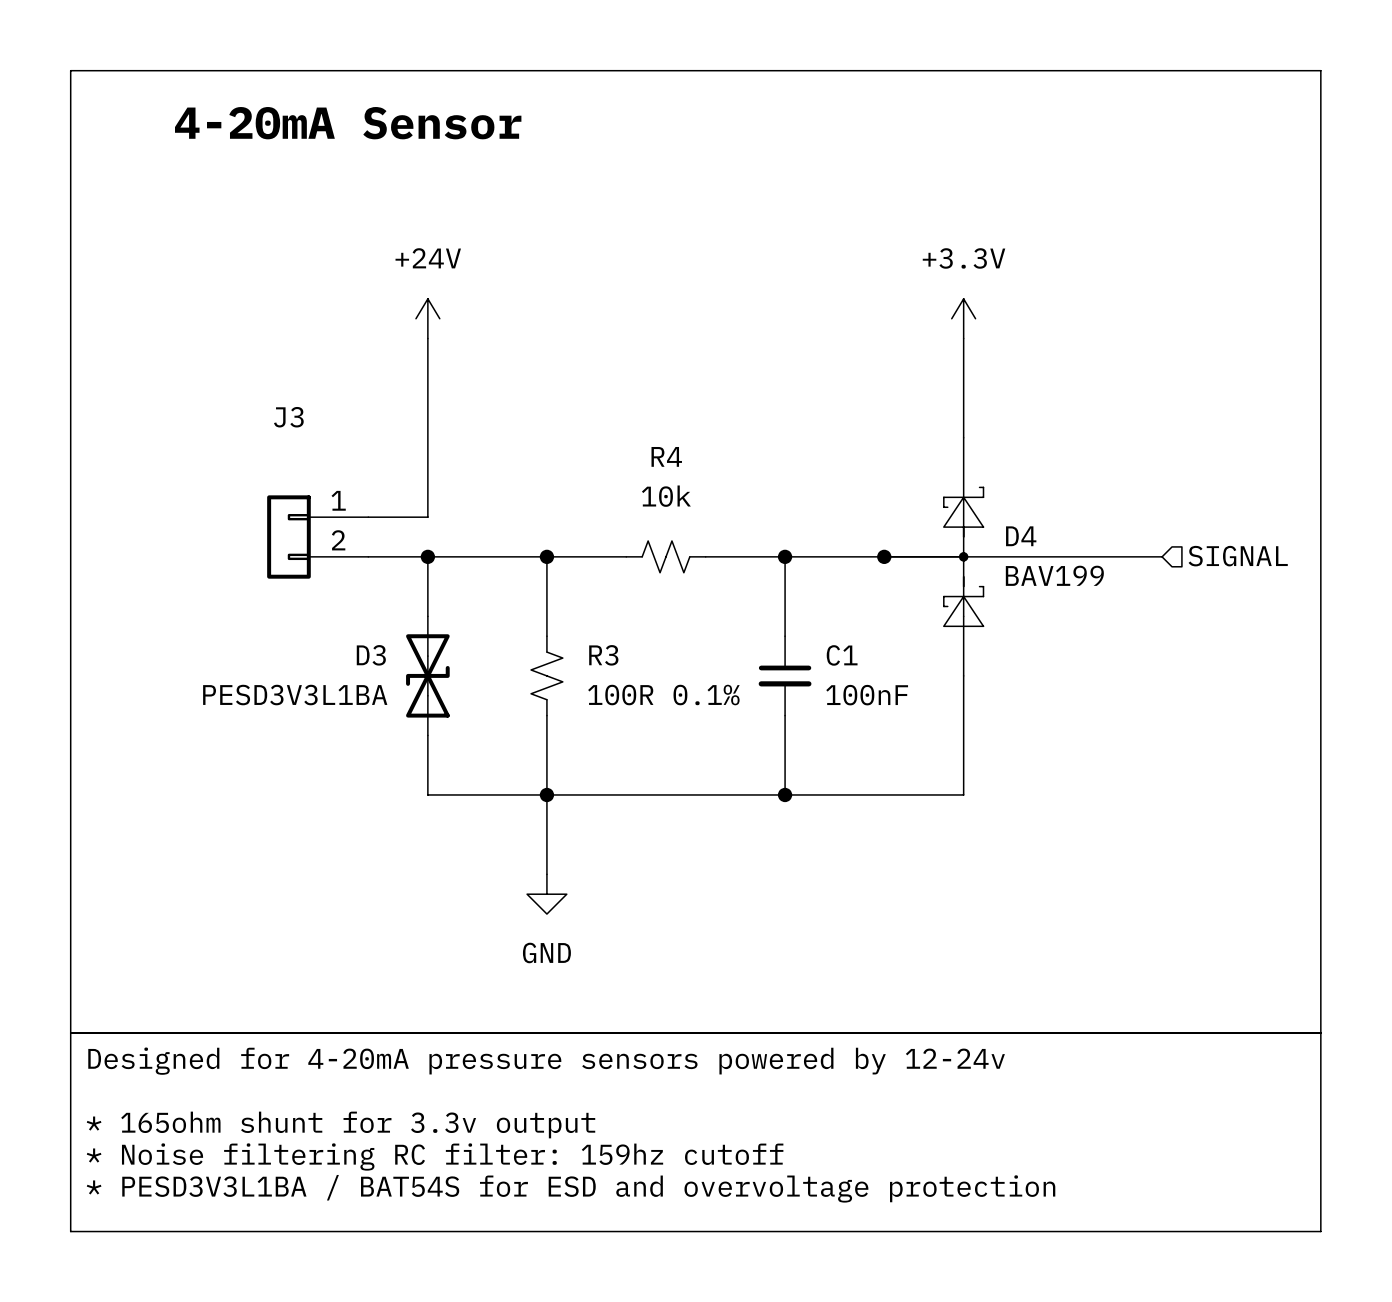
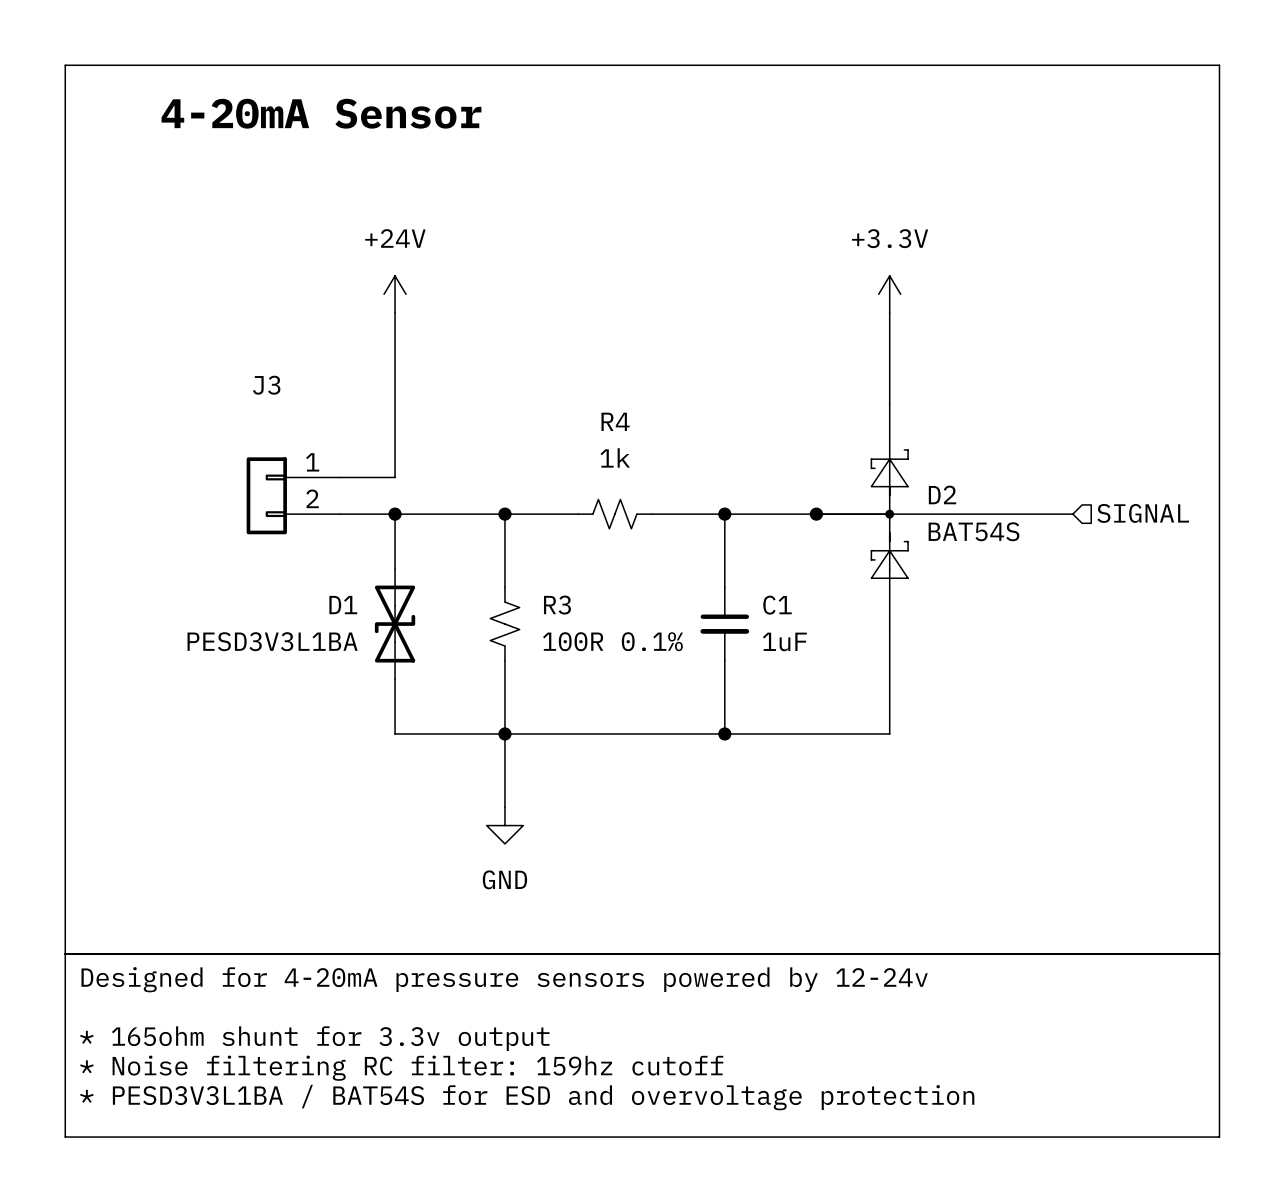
R4 value: 10k (666, 496) -> 1k (615, 457)
D4 name: D4 (1021, 536) -> D2 (942, 494)
D4 value: BAV199 (1054, 575) -> BAT54S (973, 531)
D3 name: D3 (371, 655) -> D1 (343, 605)
C1 value: 100nF (867, 695) -> 1uF (784, 641)

